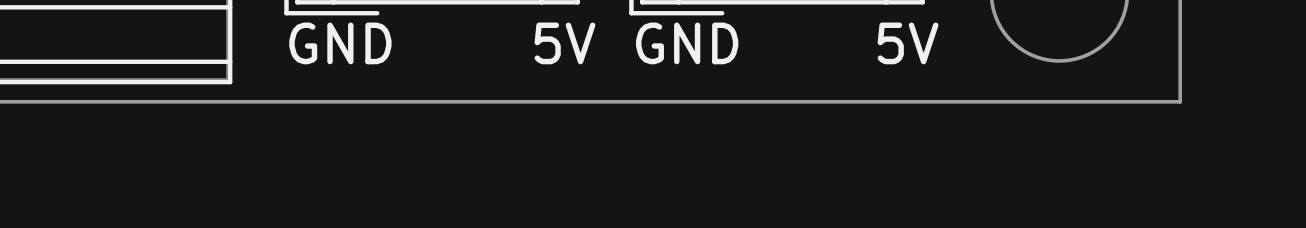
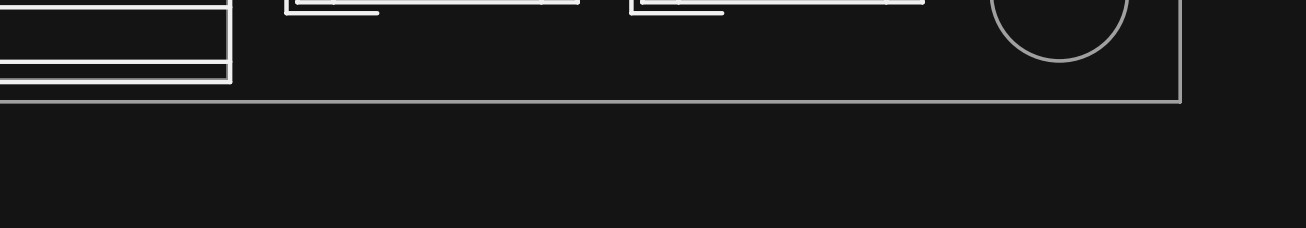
text: GND (340, 43) -> none
text: 5V (564, 43) -> none
text: GND (687, 43) -> none
text: 5V (908, 43) -> none

